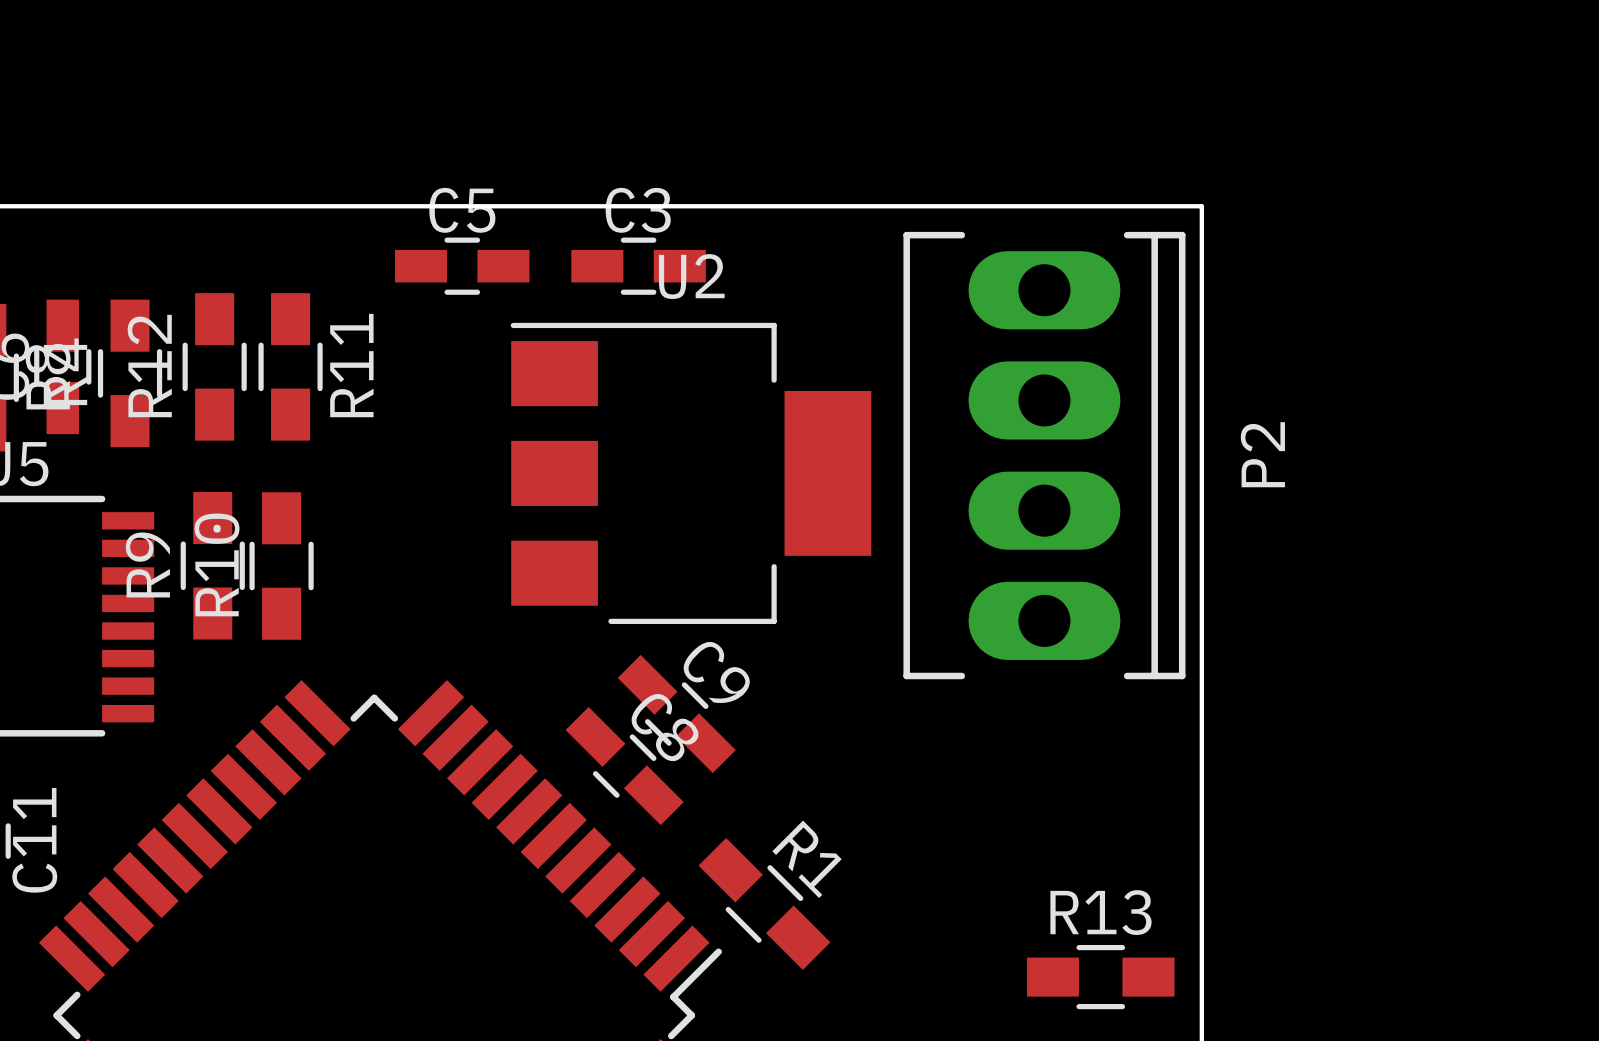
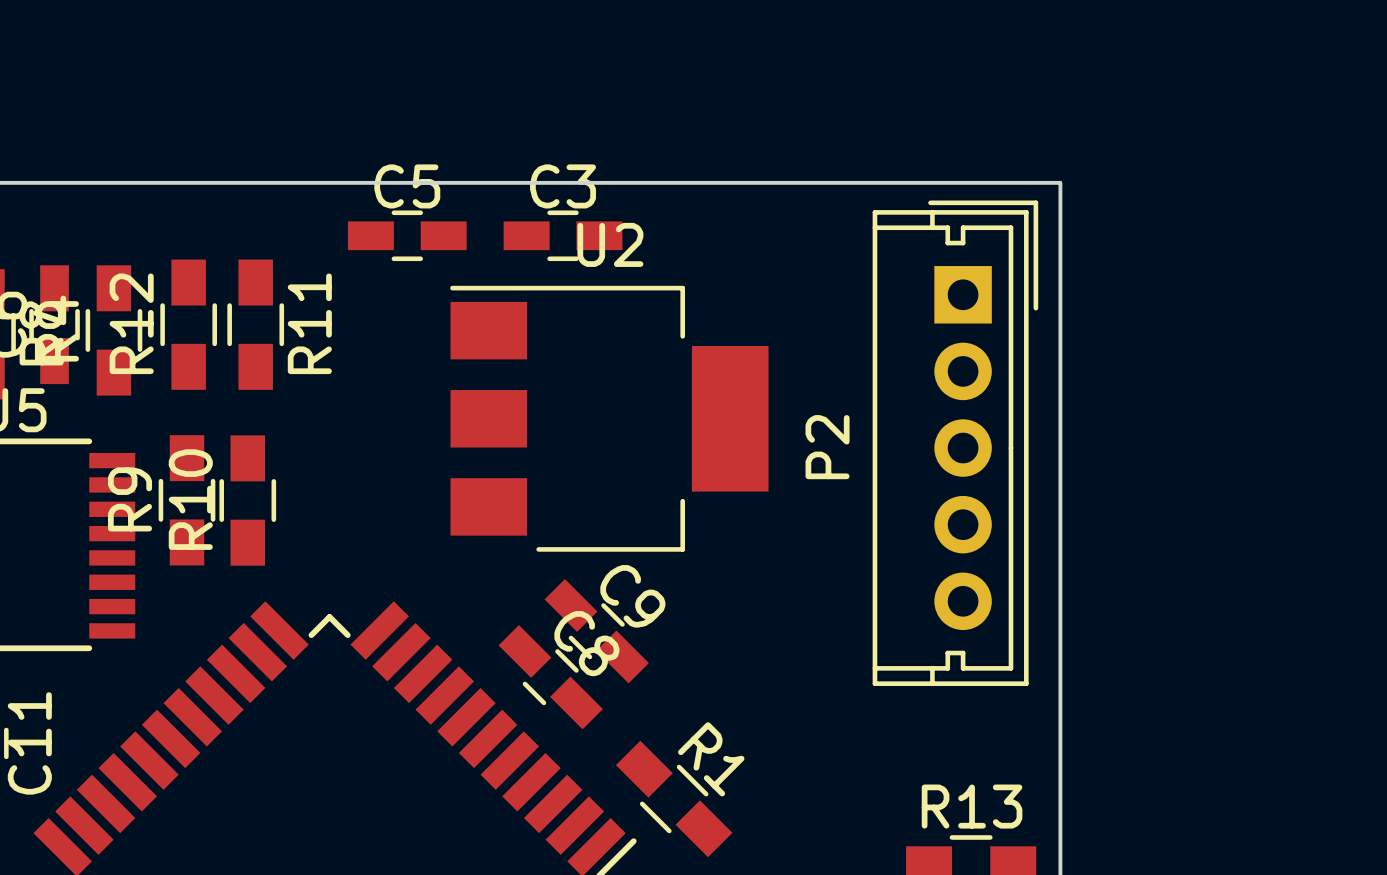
P2 footprint: [903, 231, 1186, 680] -> [872, 200, 1039, 686]
P2 name position: P2 (1262, 454) -> P2 (827, 447)

